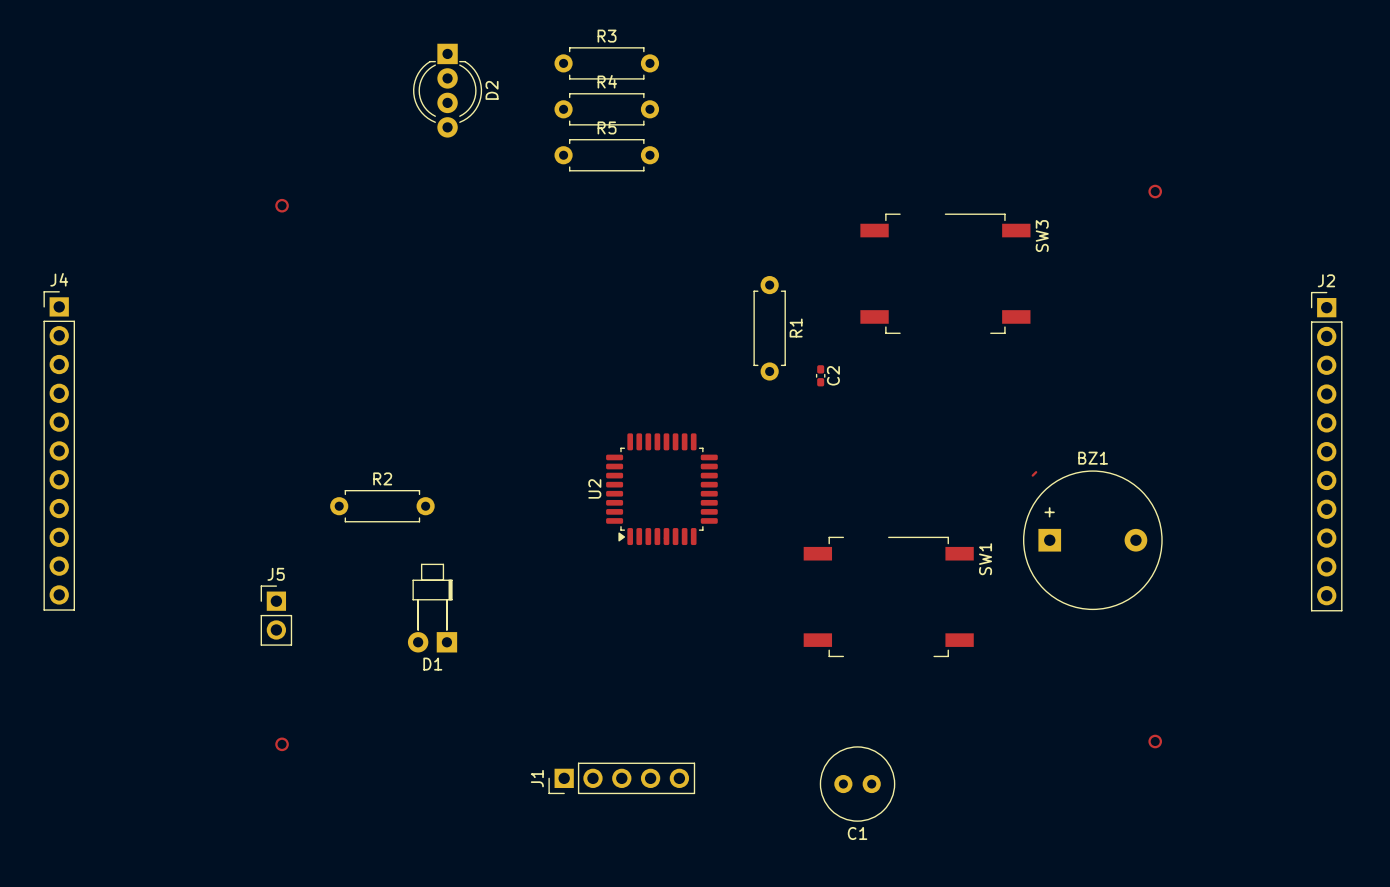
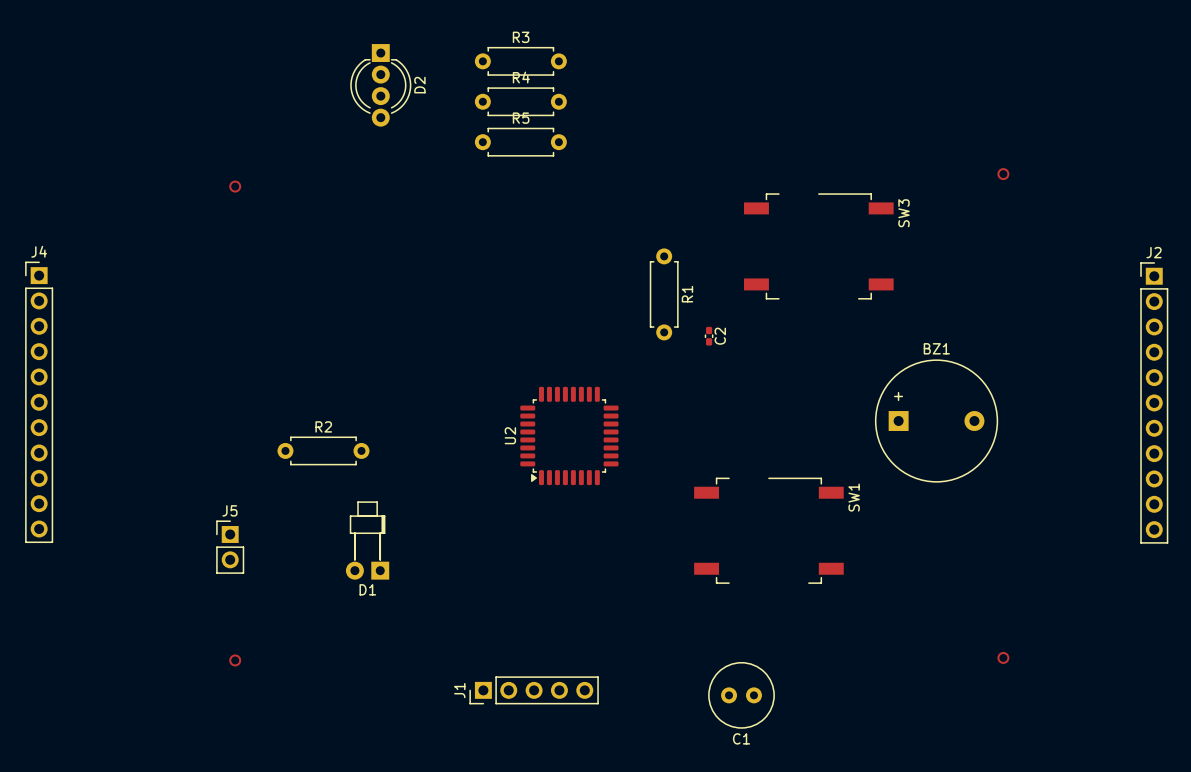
BZ1 position: (1092, 540) -> (936, 421)

